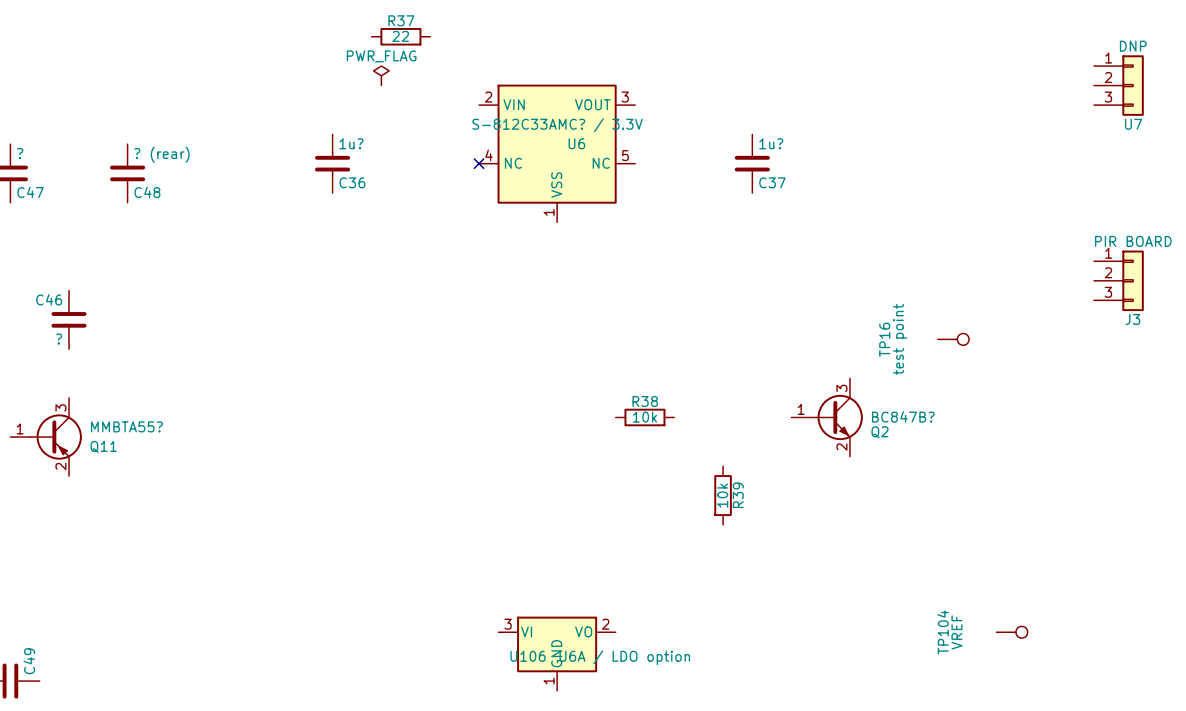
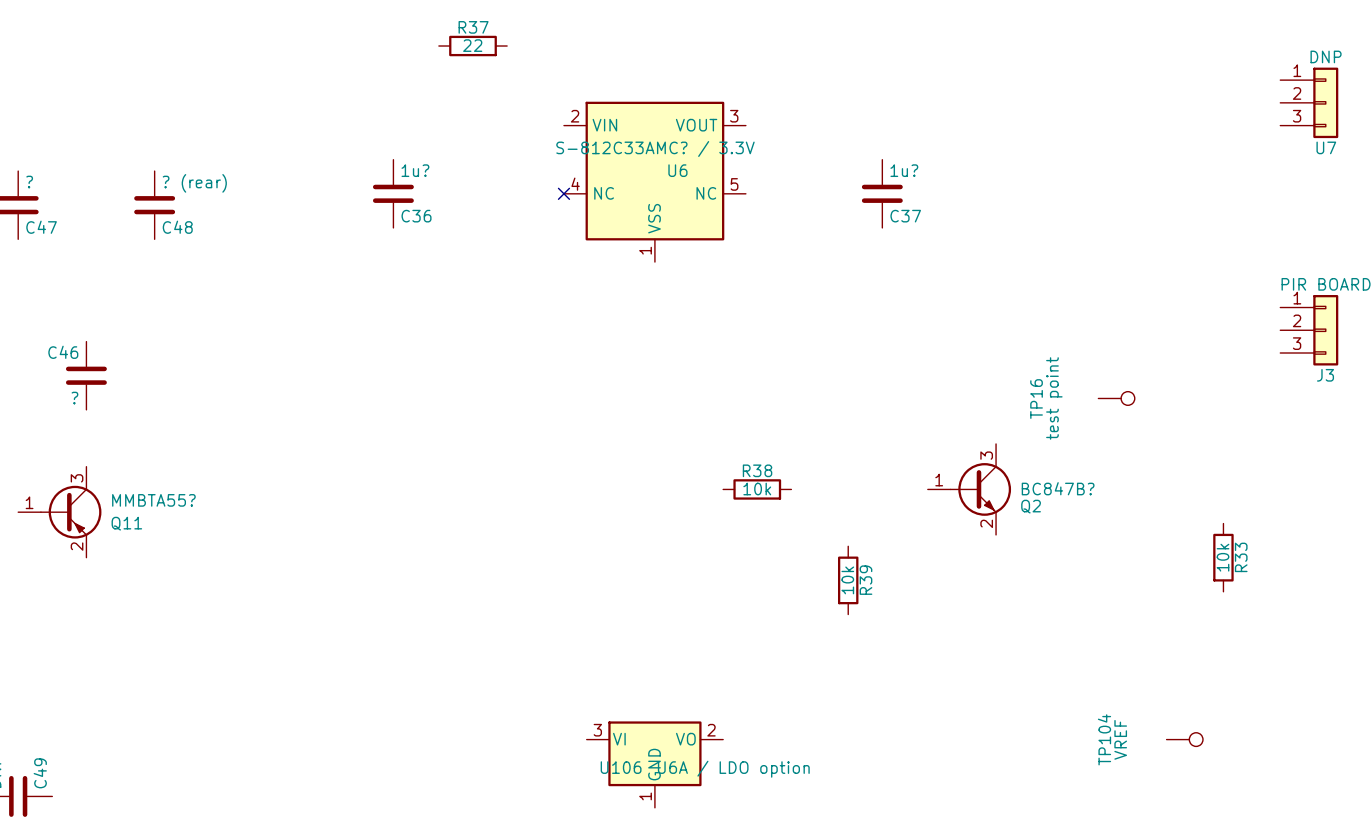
power symbol: PWR_FLAG (381, 75) -> none
R33: none -> 10k (1223, 557)

